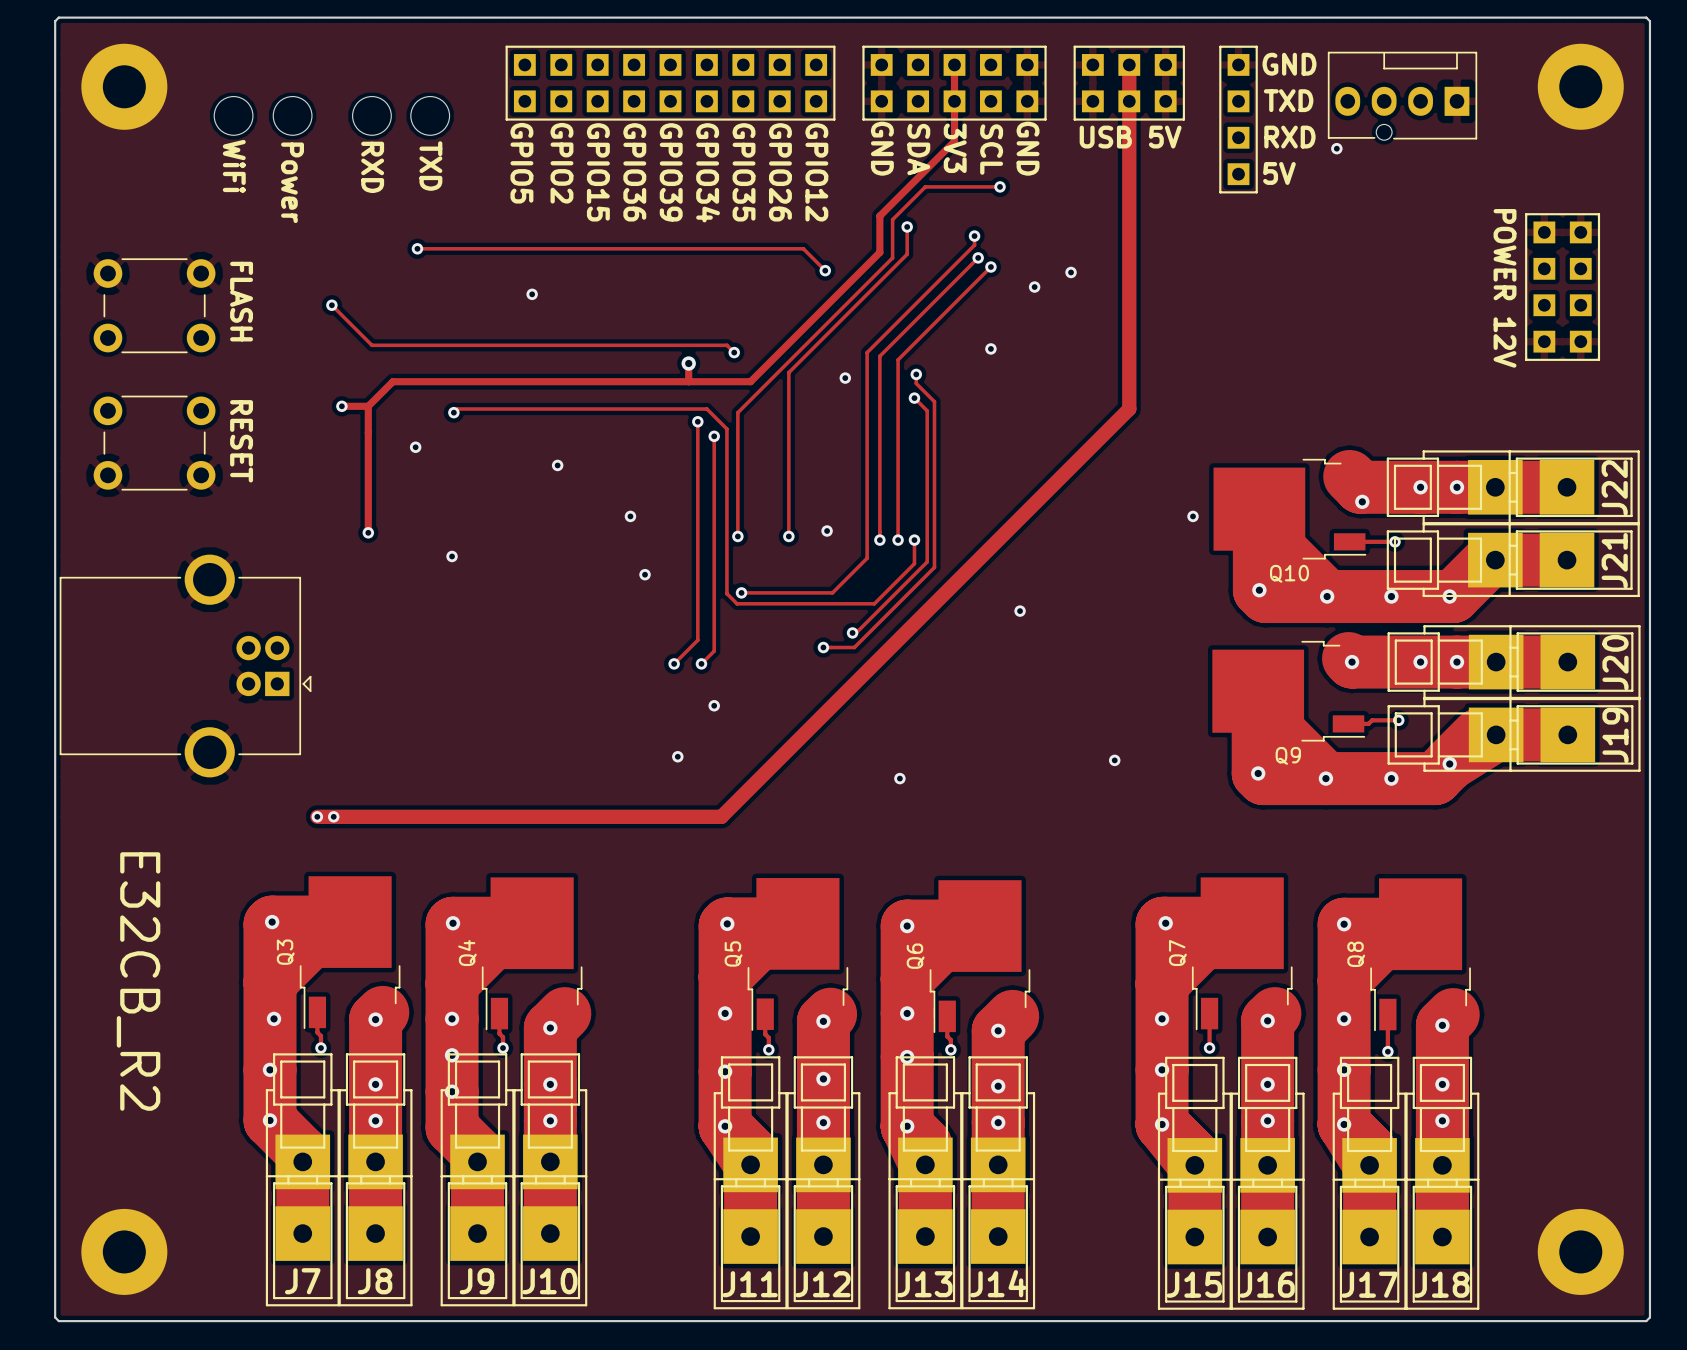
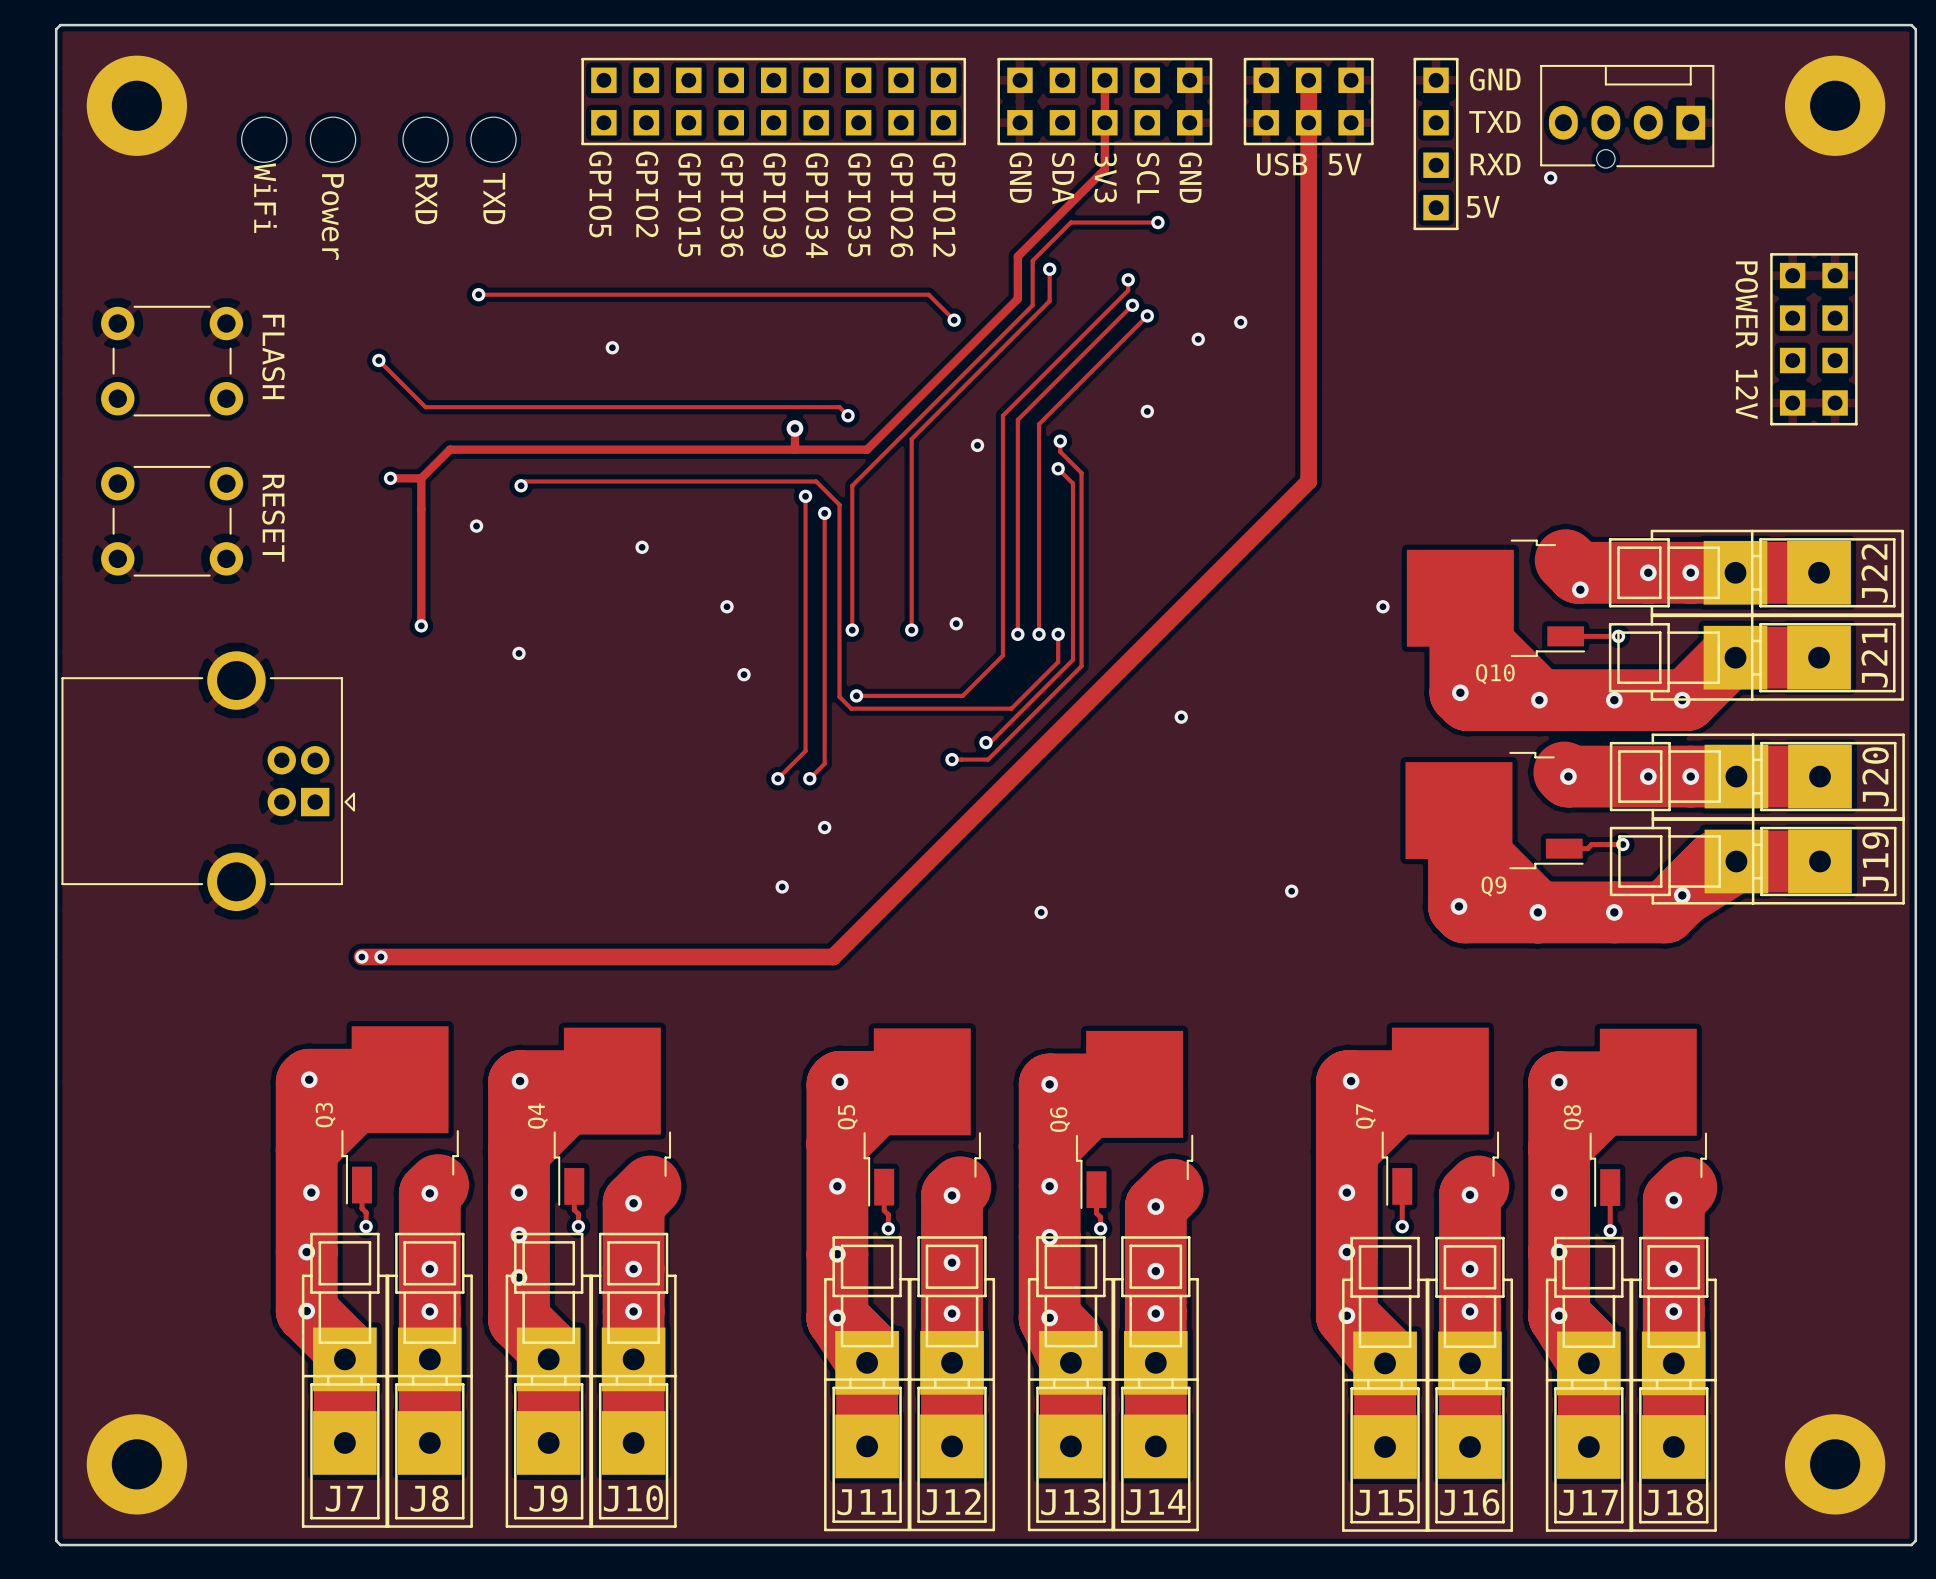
text: E32CB_R2 (138, 981) -> none

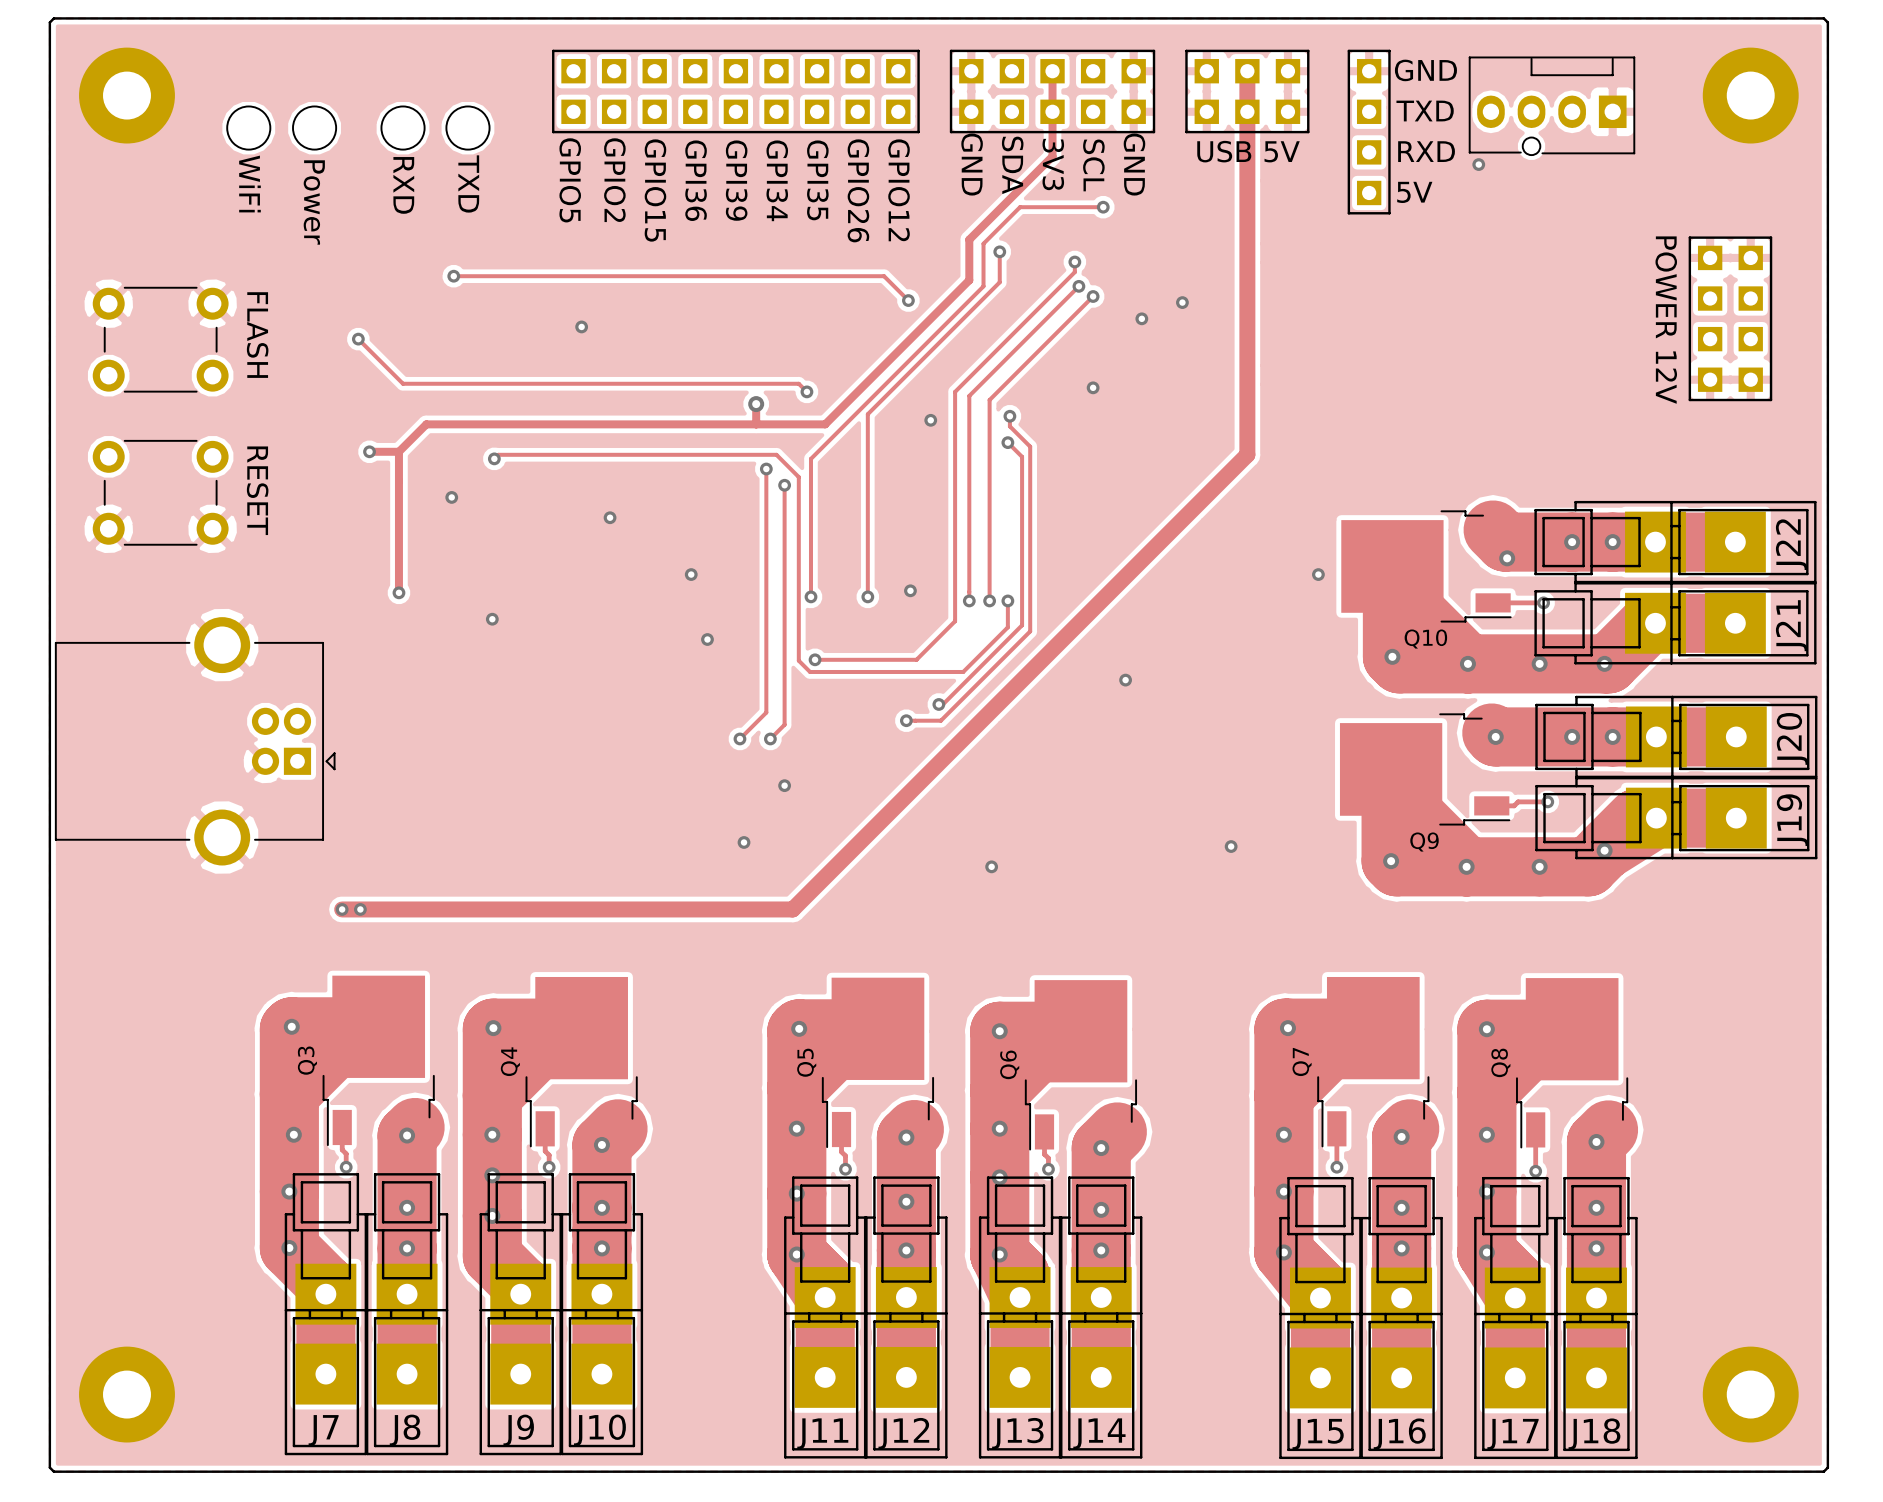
text: GPIO36 (732, 205) -> GPI36 (696, 180)
text: GPIO39 (774, 205) -> GPI39 (736, 180)
text: GPIO34 (816, 205) -> GPI34 (777, 180)
text: GPIO35 (859, 205) -> GPI35 (817, 180)

